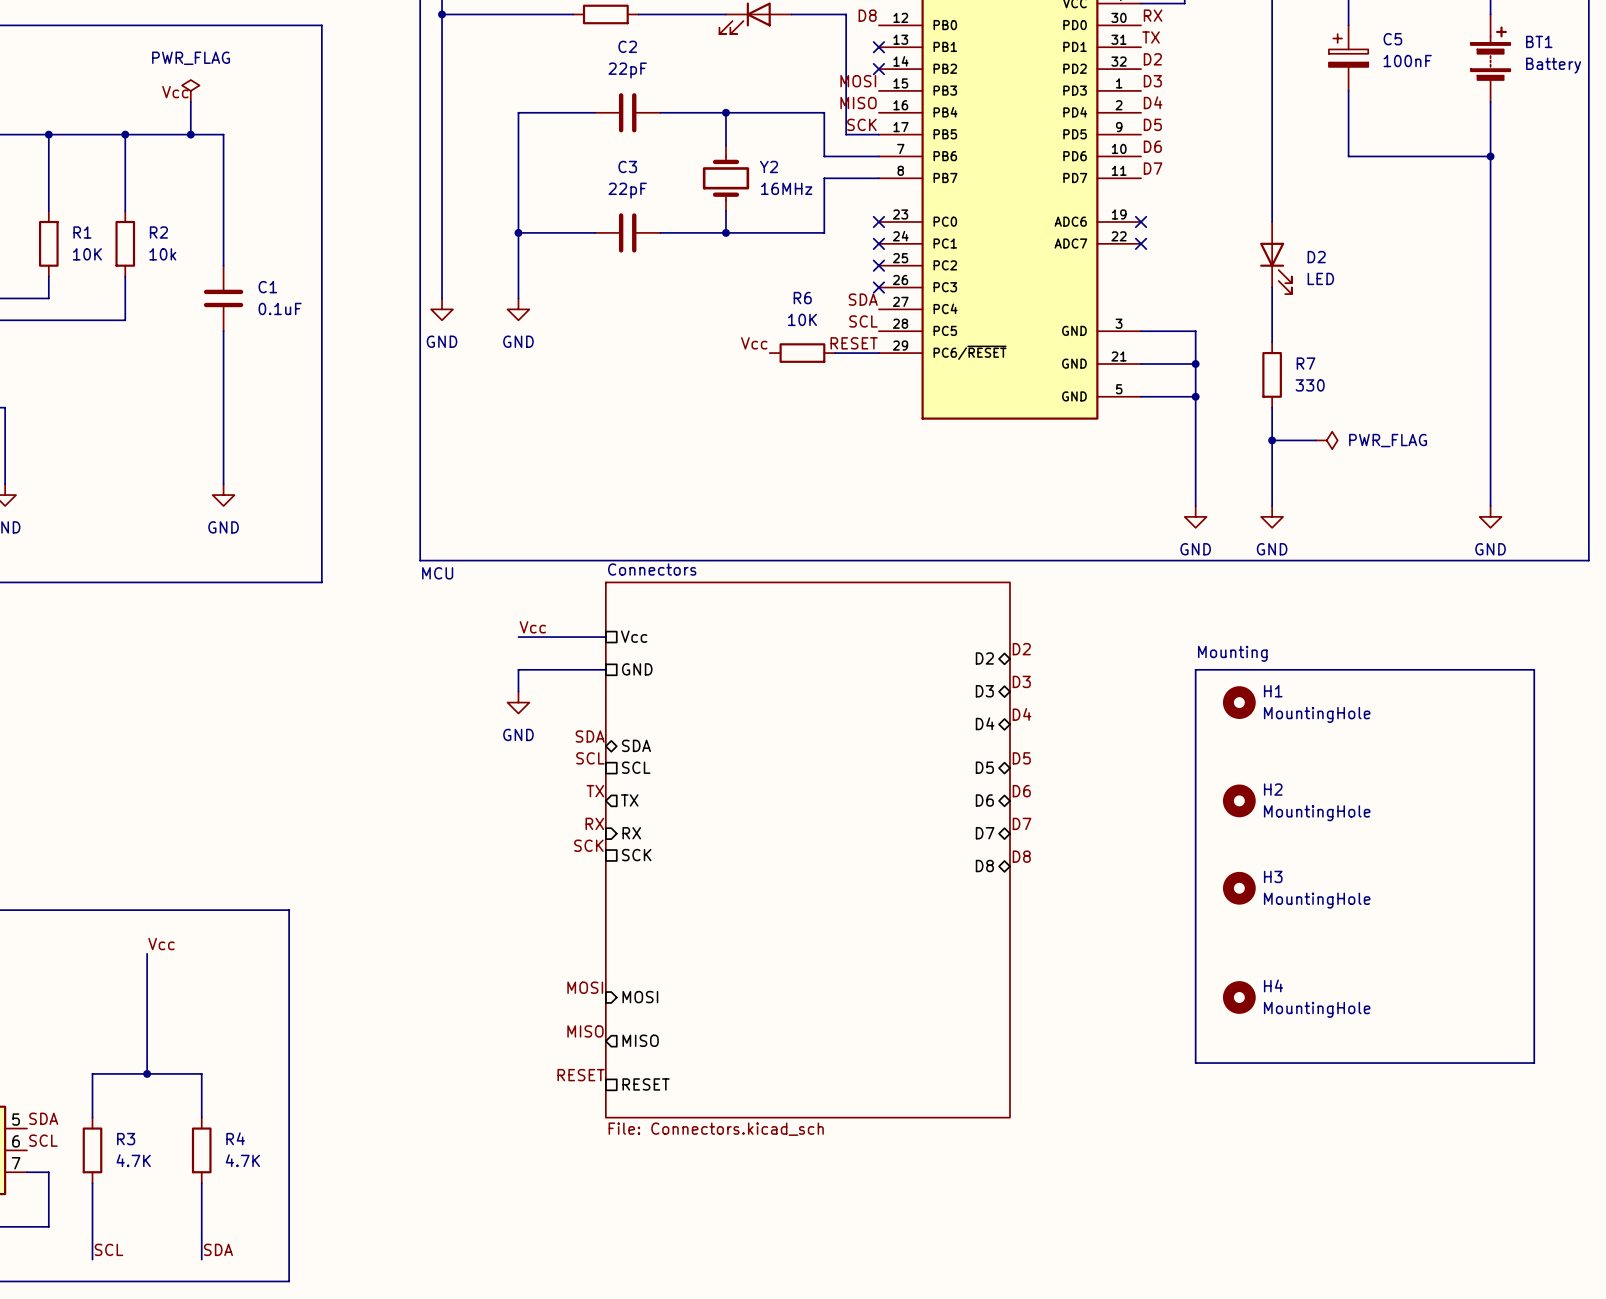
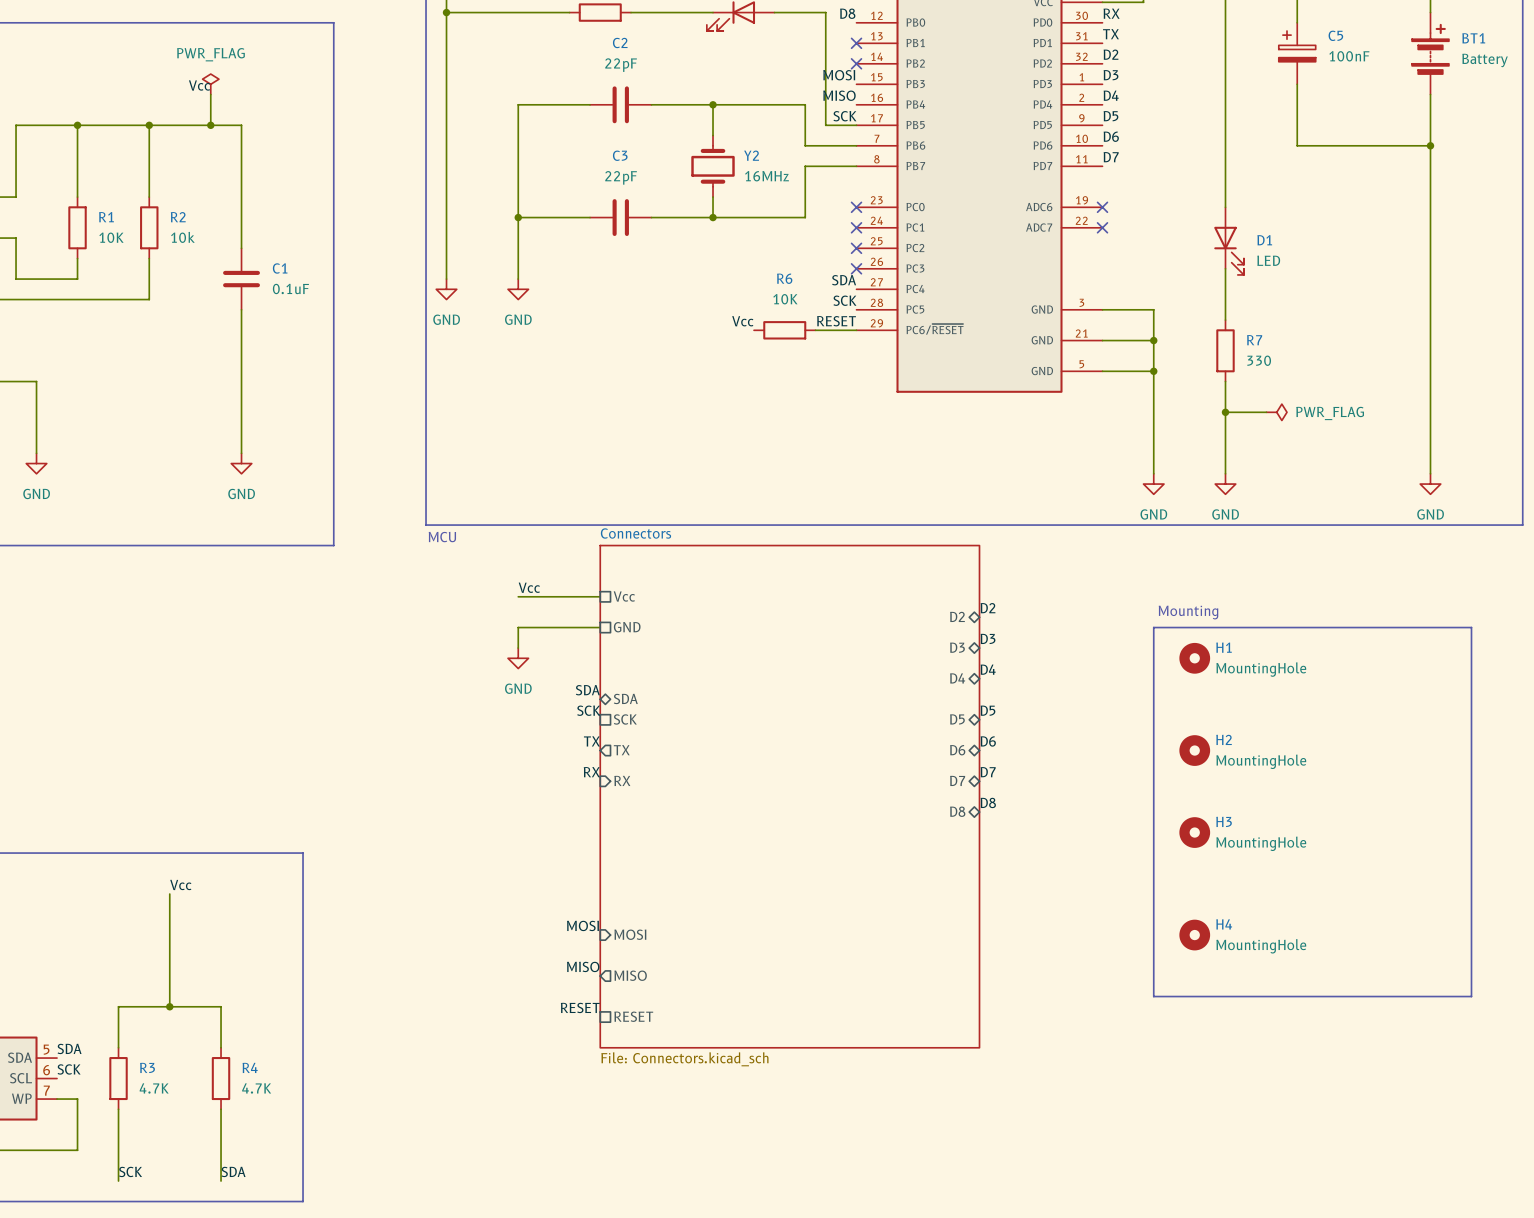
D2 name: D2 (1316, 257) -> D1 (1264, 240)
label: SCL (863, 321) -> SCK (844, 300)
label: SCL (590, 758) -> SCK (588, 710)
sheet pin: SCL (636, 767) -> SCK (625, 719)
label: SCK (588, 845) -> none
sheet pin: SCK (636, 855) -> none
label: SCL (43, 1140) -> SCK (69, 1069)
label: SCL (108, 1249) -> SCK (130, 1171)

